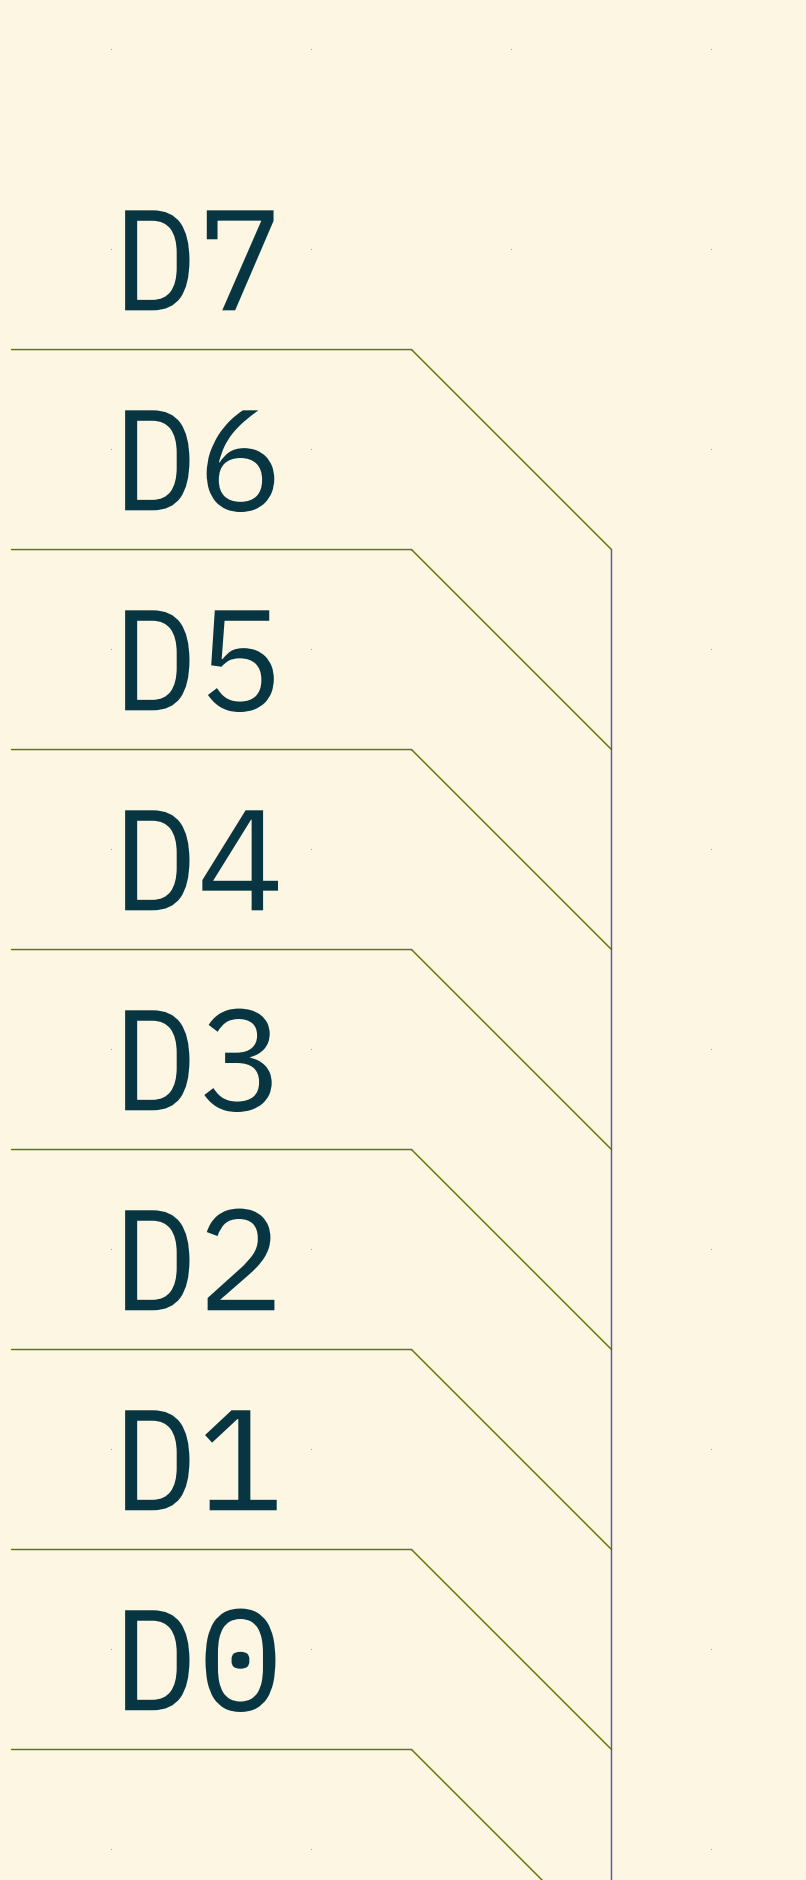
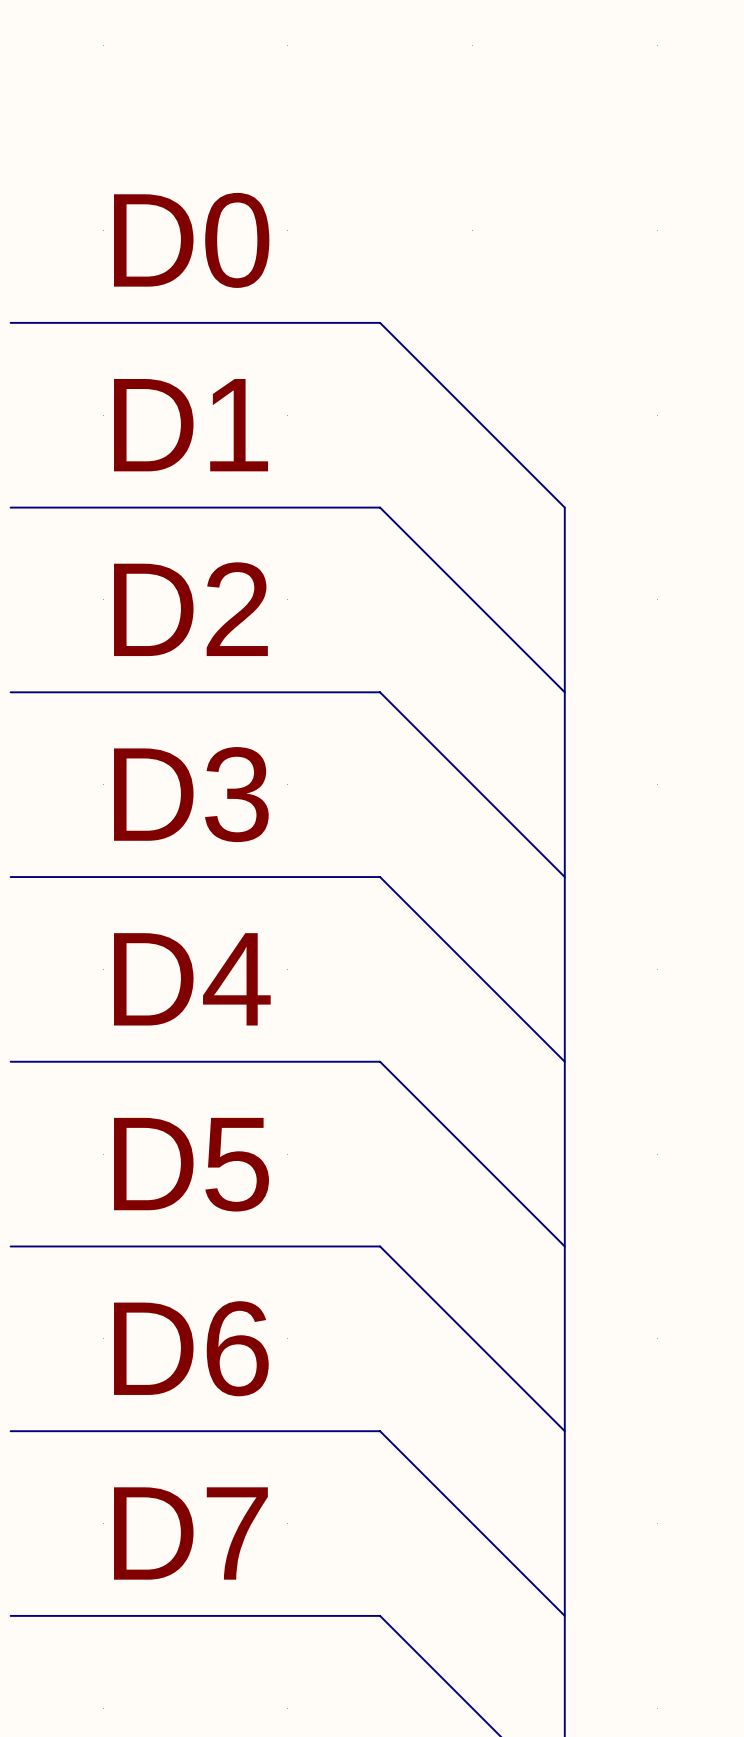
label: D7 (199, 260) -> D0 (191, 240)
label: D6 (199, 461) -> D1 (191, 425)
label: D5 (199, 661) -> D2 (190, 609)
label: D4 (201, 860) -> D3 (191, 794)
label: D3 (198, 1060) -> D4 (192, 979)
label: D2 (199, 1259) -> D5 (191, 1164)
label: D1 (200, 1460) -> D6 (191, 1348)
label: D0 (200, 1660) -> D7 (190, 1533)

